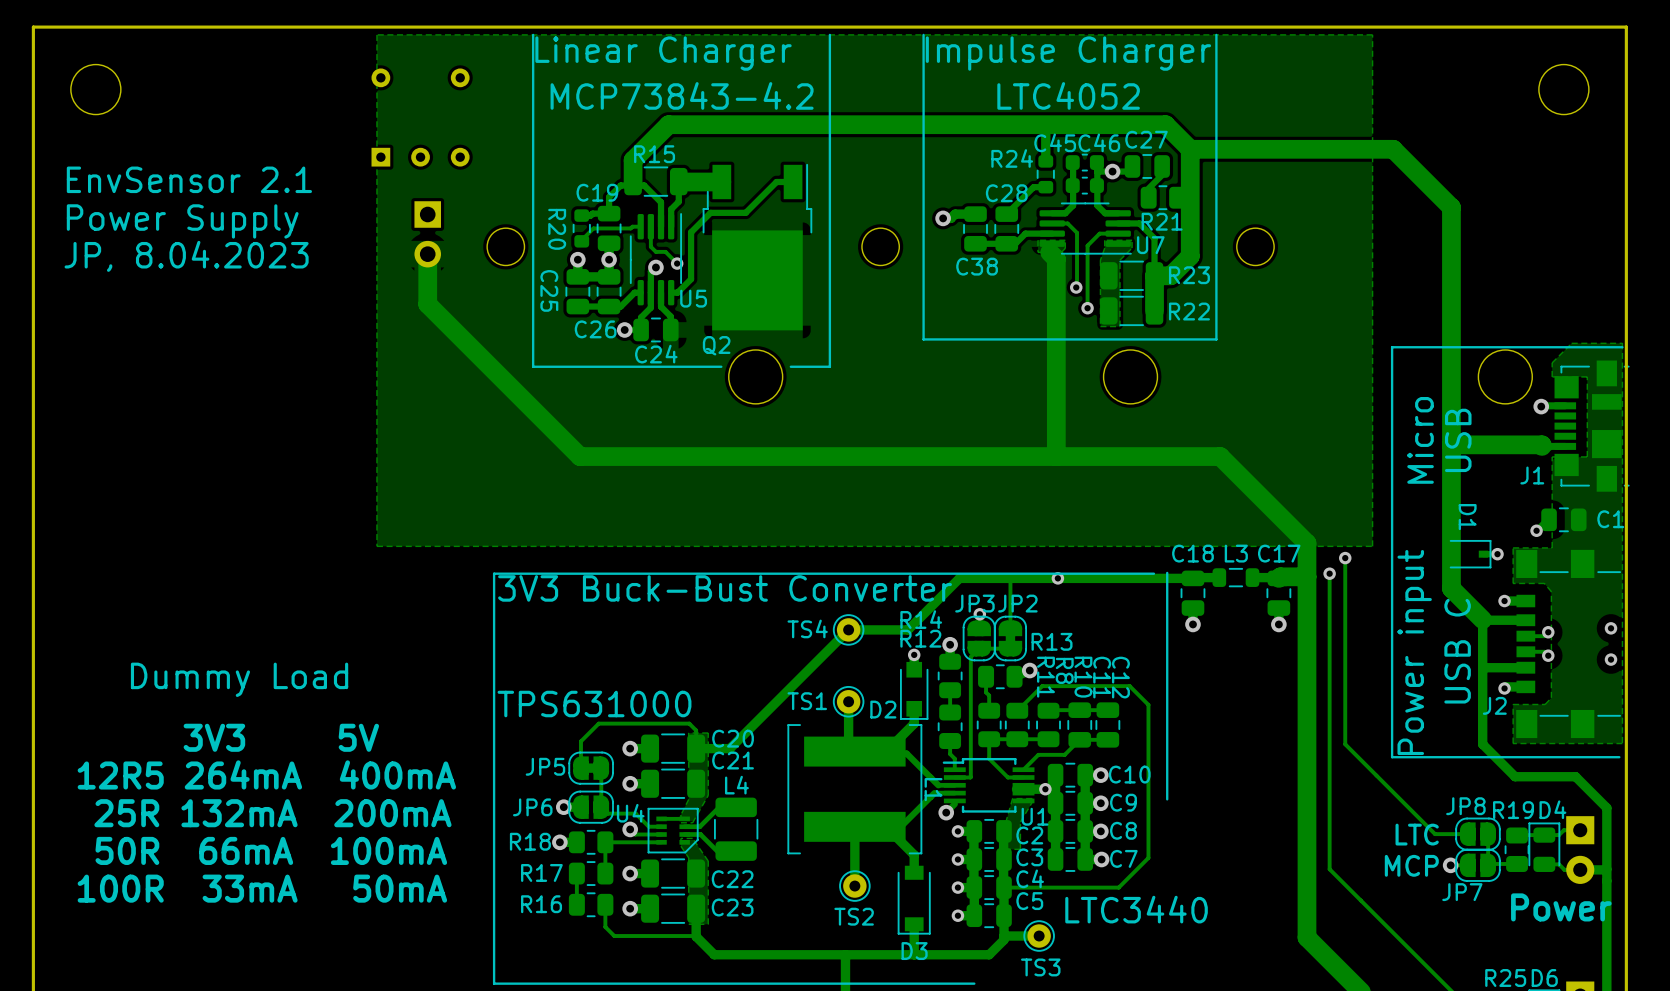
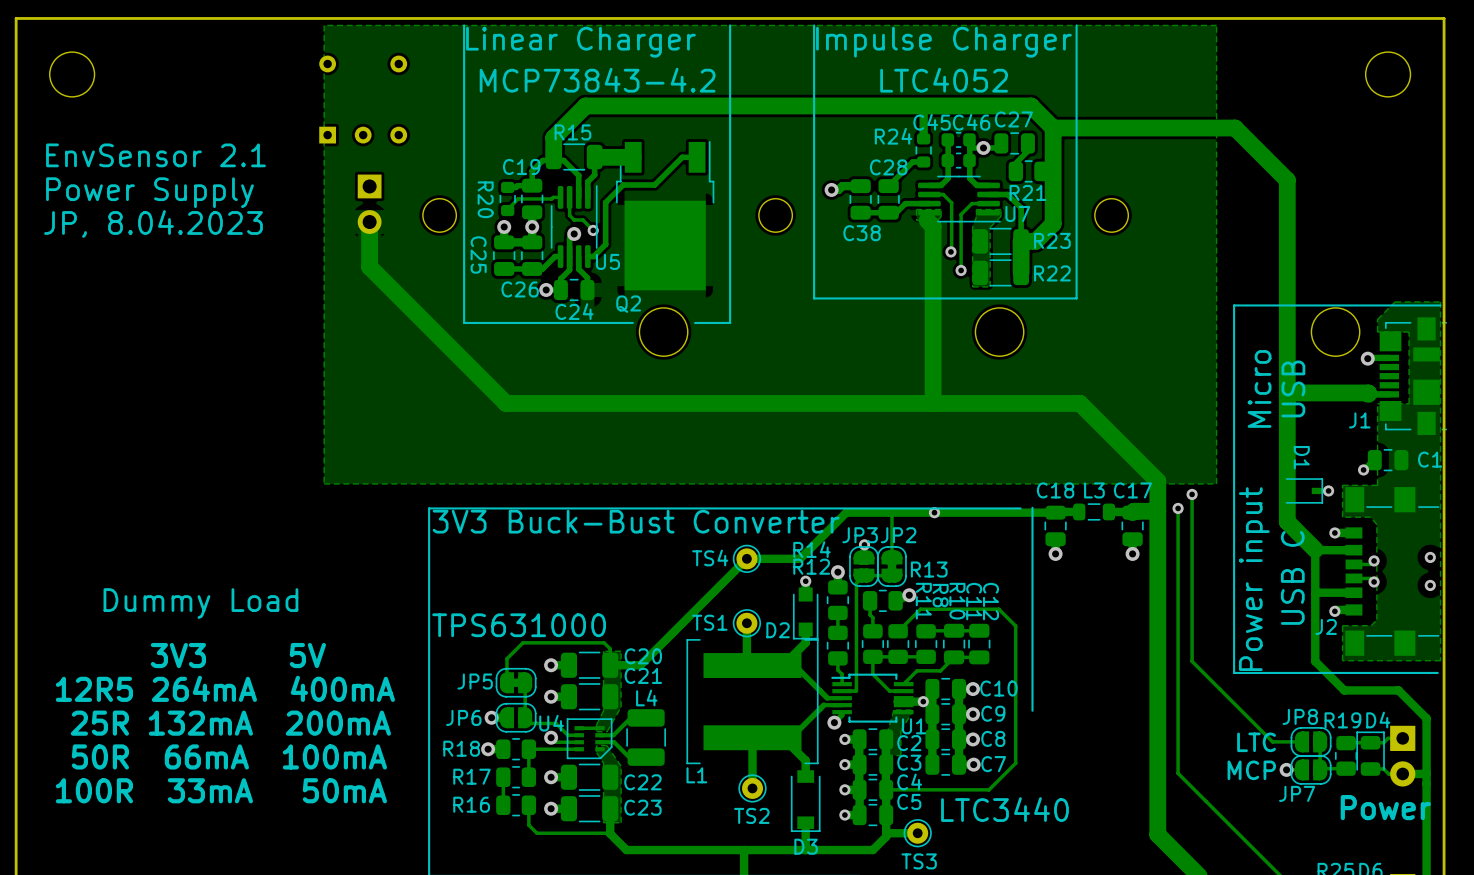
L1 footprint: [787, 724, 923, 855] -> [686, 639, 819, 765]
L1 name rotation: 0° (933, 789) -> 90° counterclockwise (696, 775)
L1 name position: L1 (933, 789) -> L1 (696, 775)

